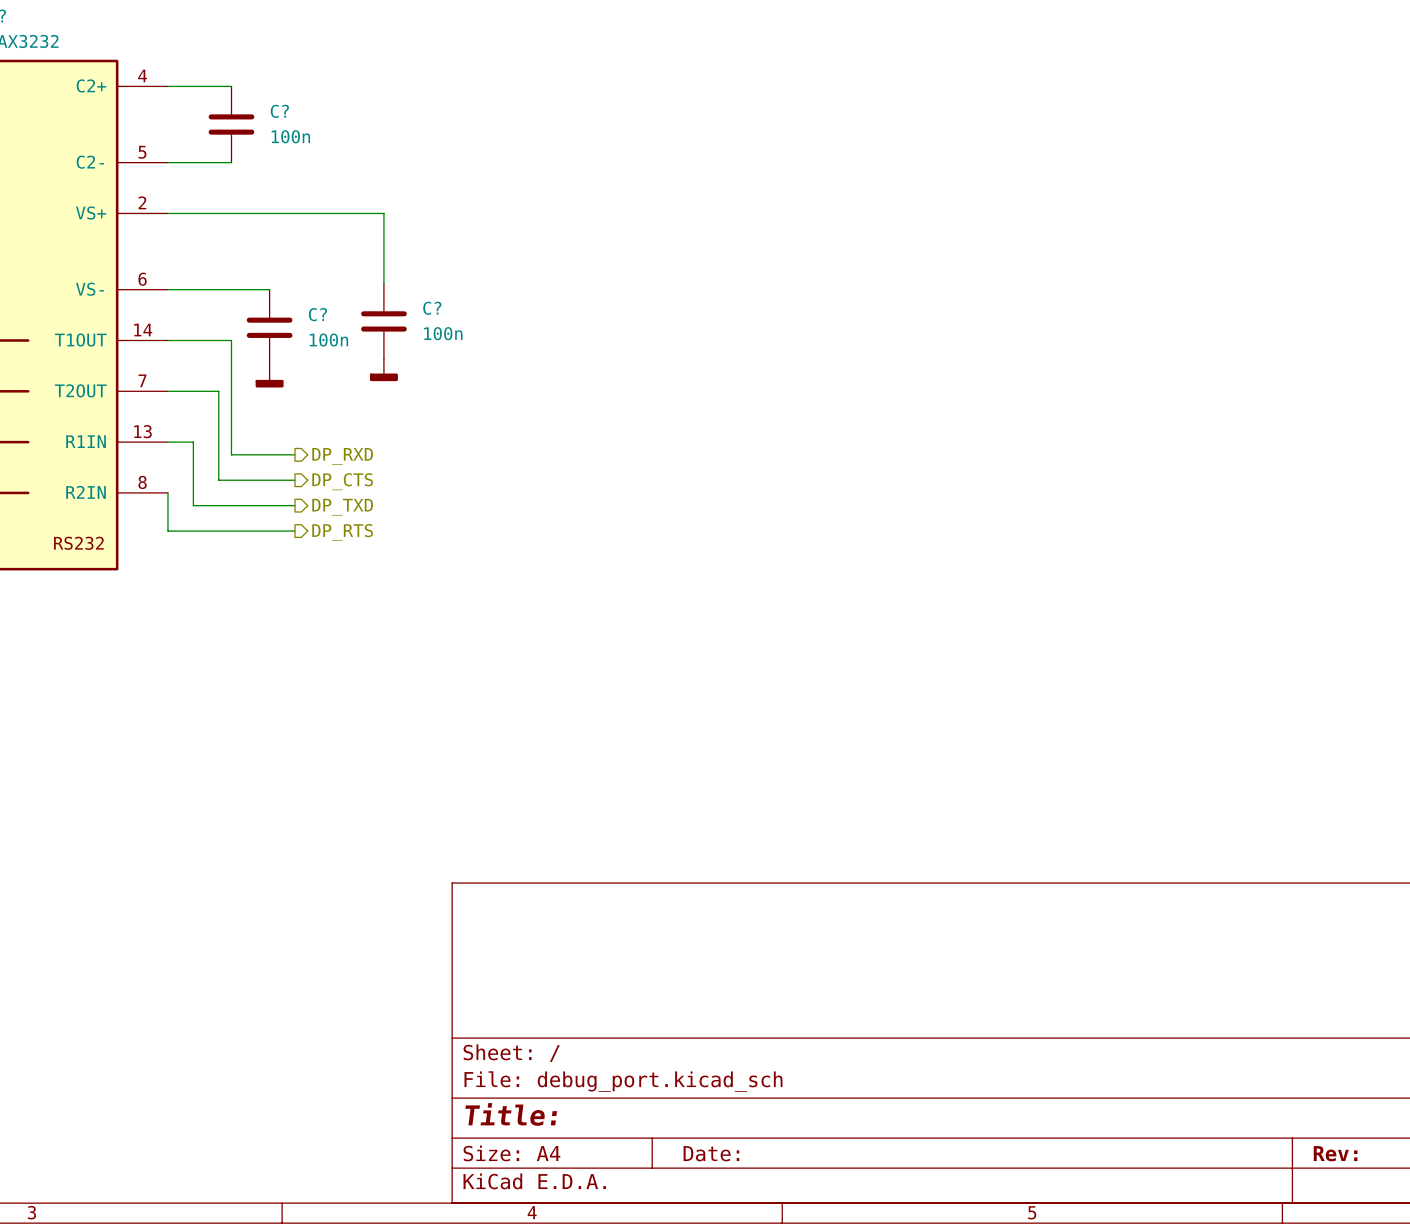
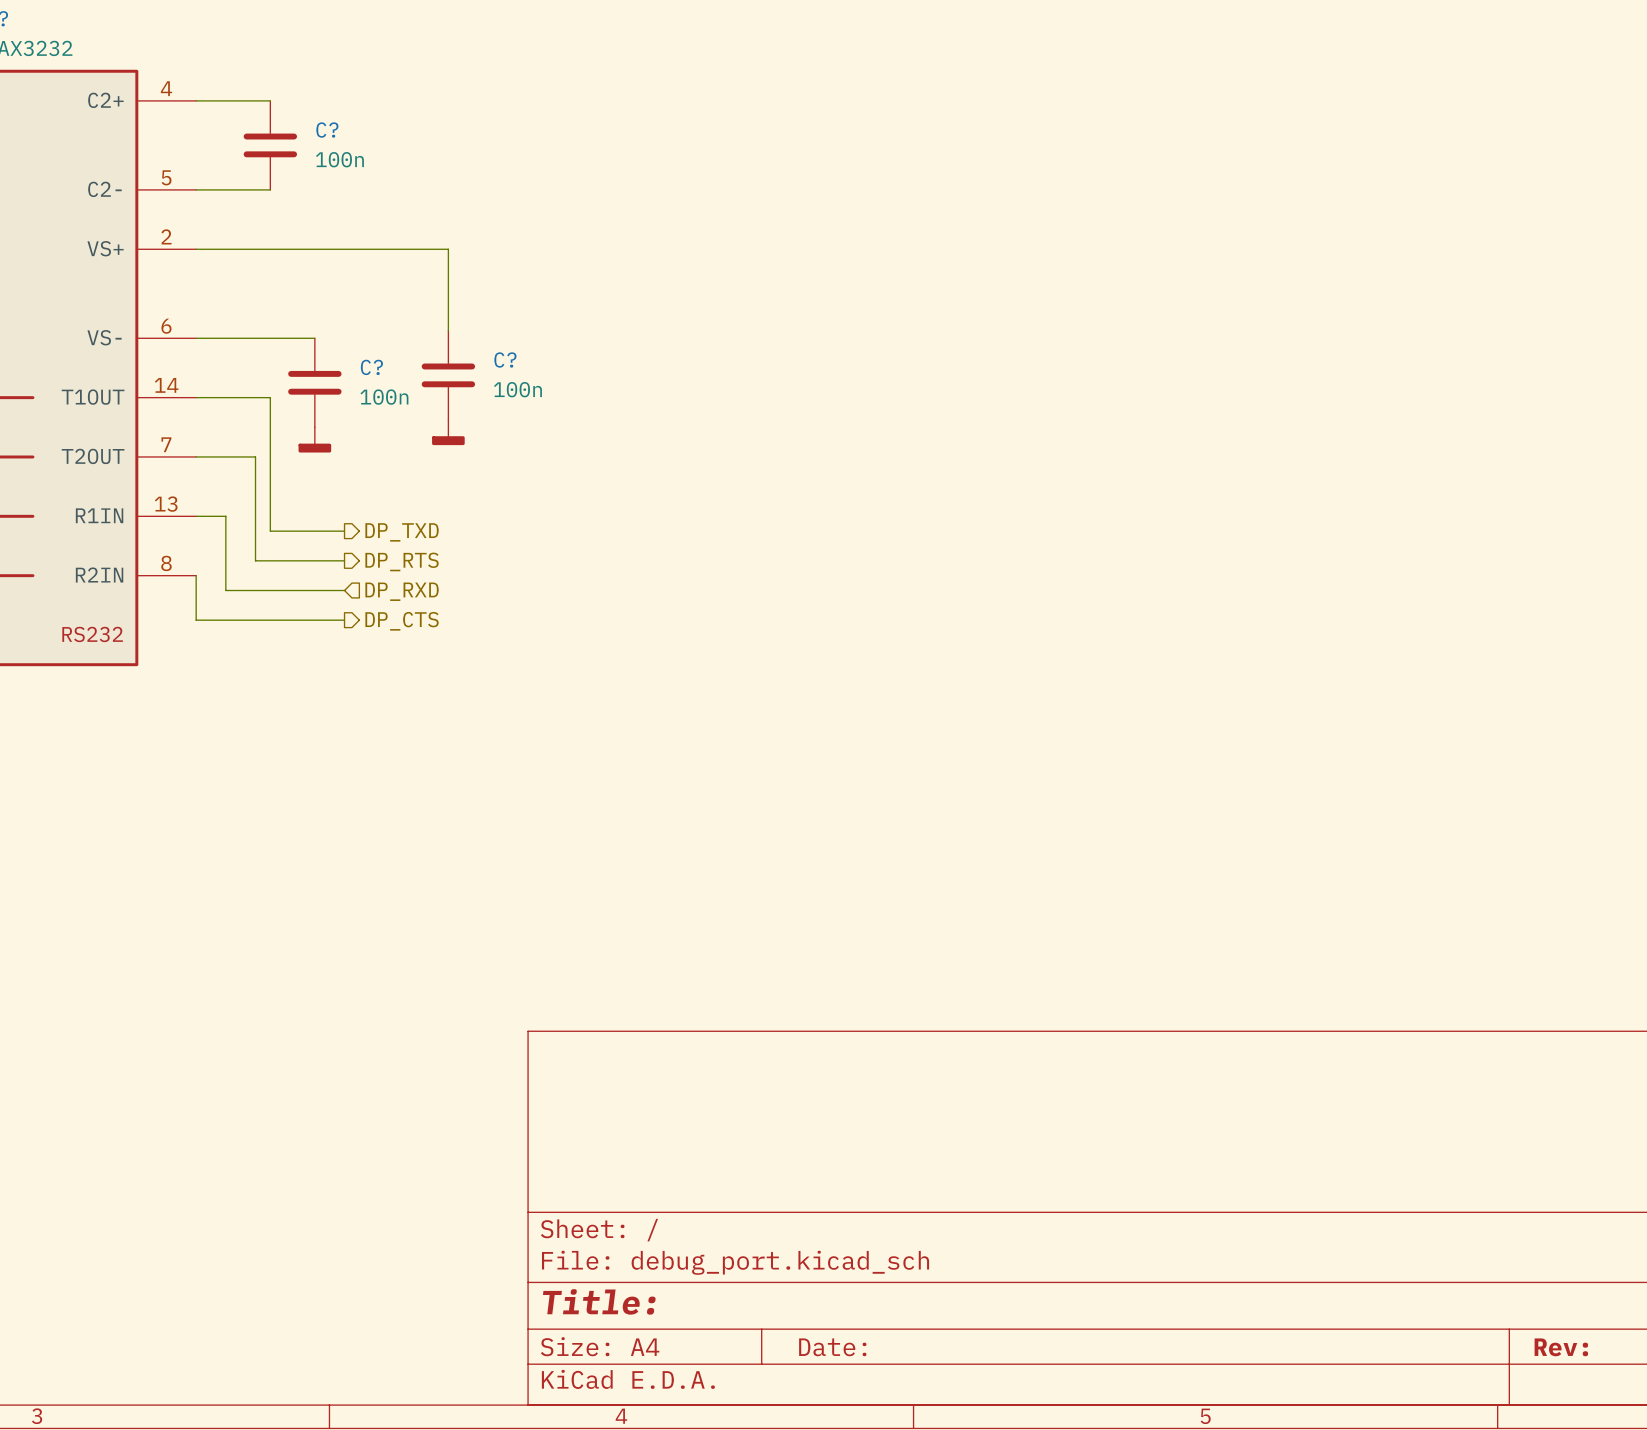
hierarchical label: DP_RXD (342, 456) -> DP_TXD (402, 532)
hierarchical label: DP_CTS (342, 481) -> DP_RTS (402, 561)
hierarchical label shape: output (342, 507) -> input (402, 591)
hierarchical label: DP_TXD (342, 507) -> DP_RXD (402, 591)
hierarchical label: DP_RTS (342, 532) -> DP_CTS (402, 621)

